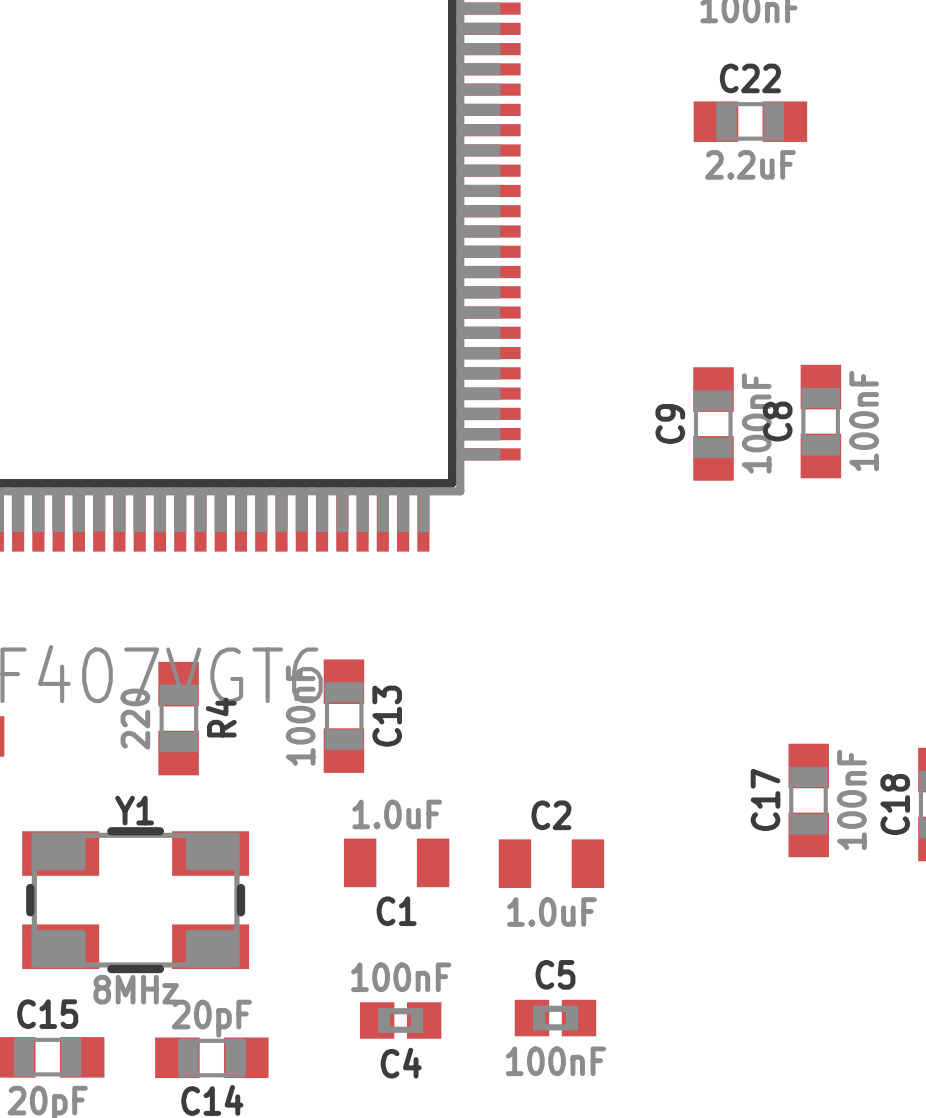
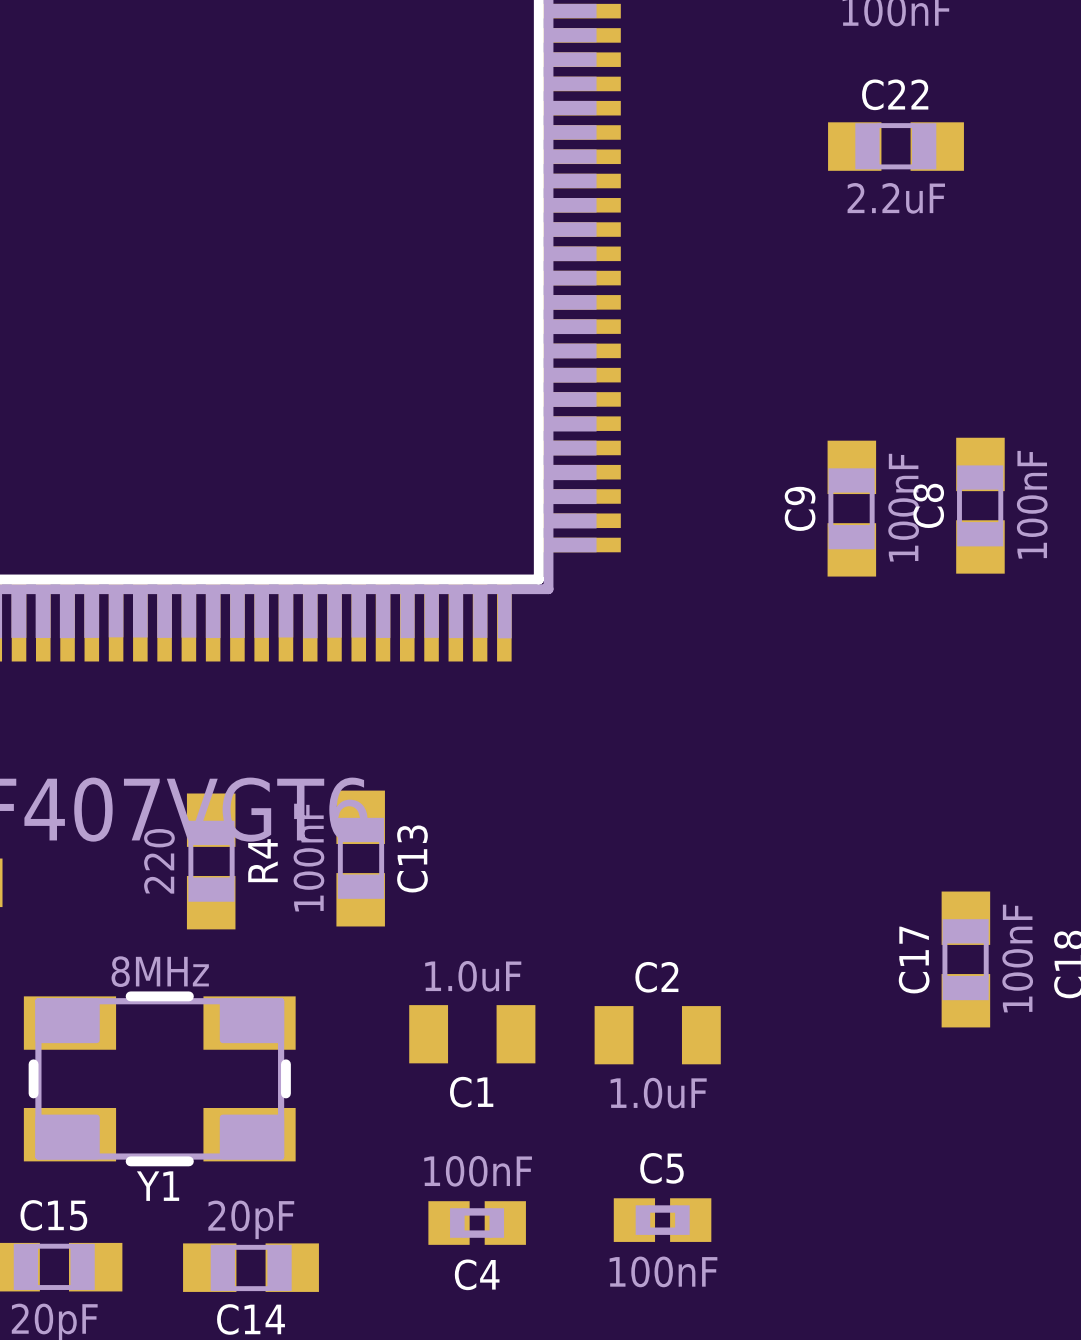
C13 position: (343, 716) -> (360, 858)
Y1 name position: Y1 (134, 810) -> Y1 (158, 1186)
Y1 value position: 8MHz (136, 989) -> 8MHz (160, 971)

